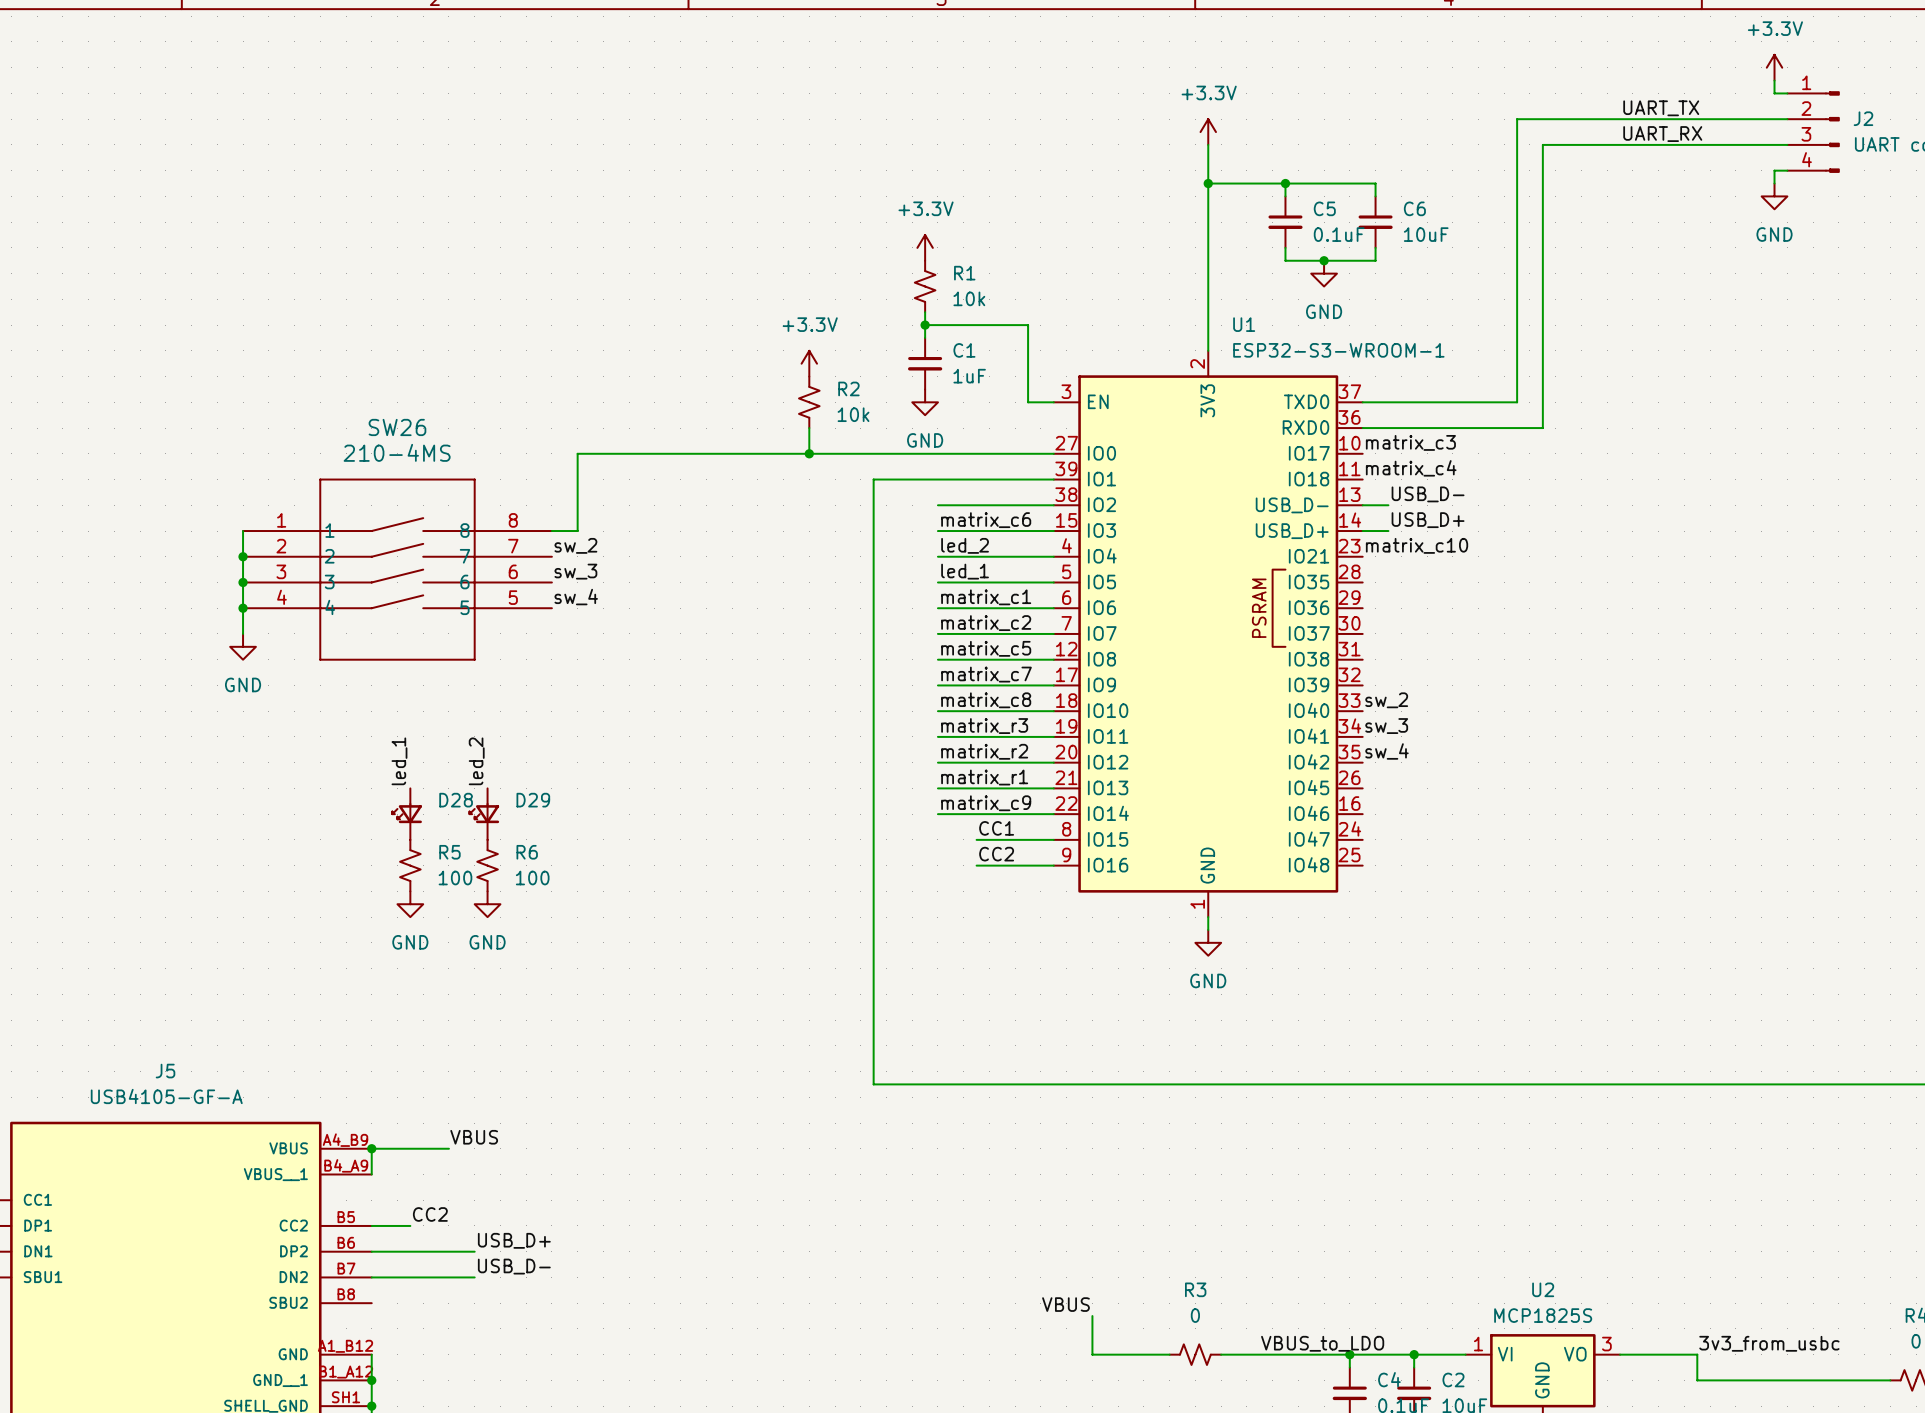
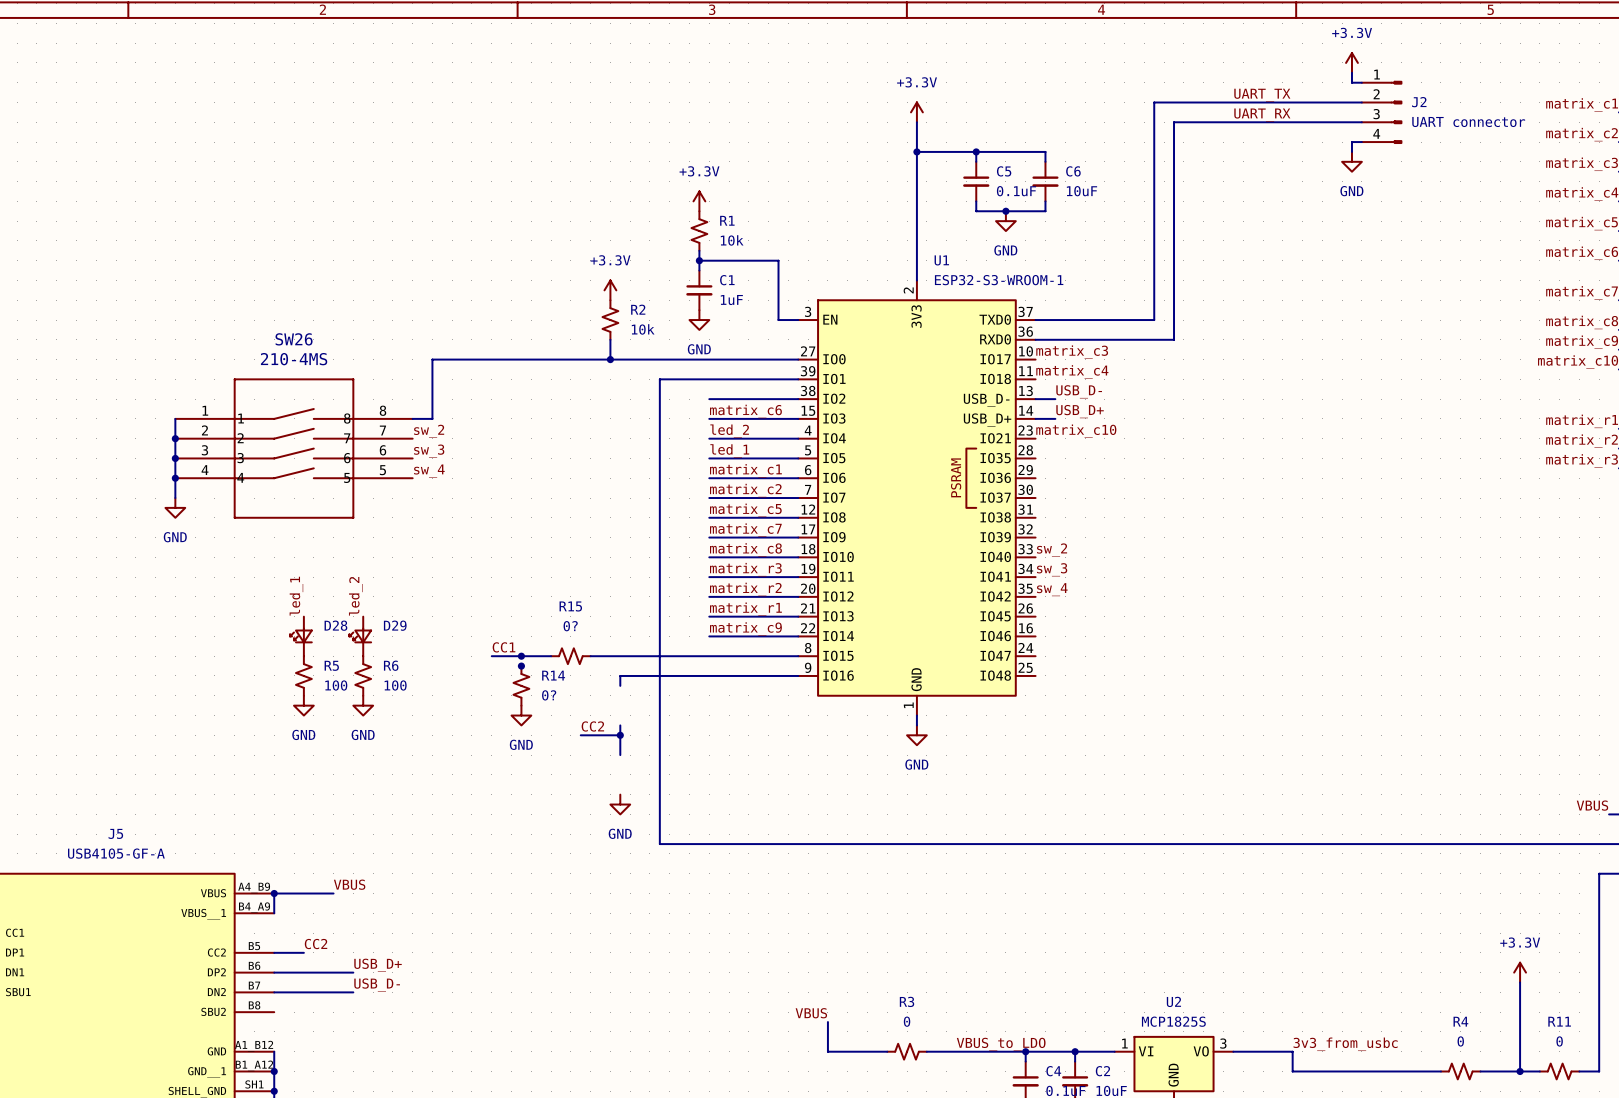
label: none -> CC1 (504, 647)
label: CC1 (996, 828) -> none
wire: none -> (491, 656) (551, 656)
junction: none -> (521, 656)
R15: none -> 0? (570, 656)
wire: none -> (590, 656) (738, 656)
junction: none -> (521, 666)
label position: CC2 (996, 854) -> CC2 (592, 726)
wire: none -> (738, 675) (620, 675) (620, 685)
R14: none -> 0? (521, 685)
power symbol: none -> GND (521, 715)
wire: none -> (620, 725) (620, 755)
wire: none -> (580, 735) (620, 735)
junction: none -> (620, 735)
power symbol: none -> GND (620, 804)

